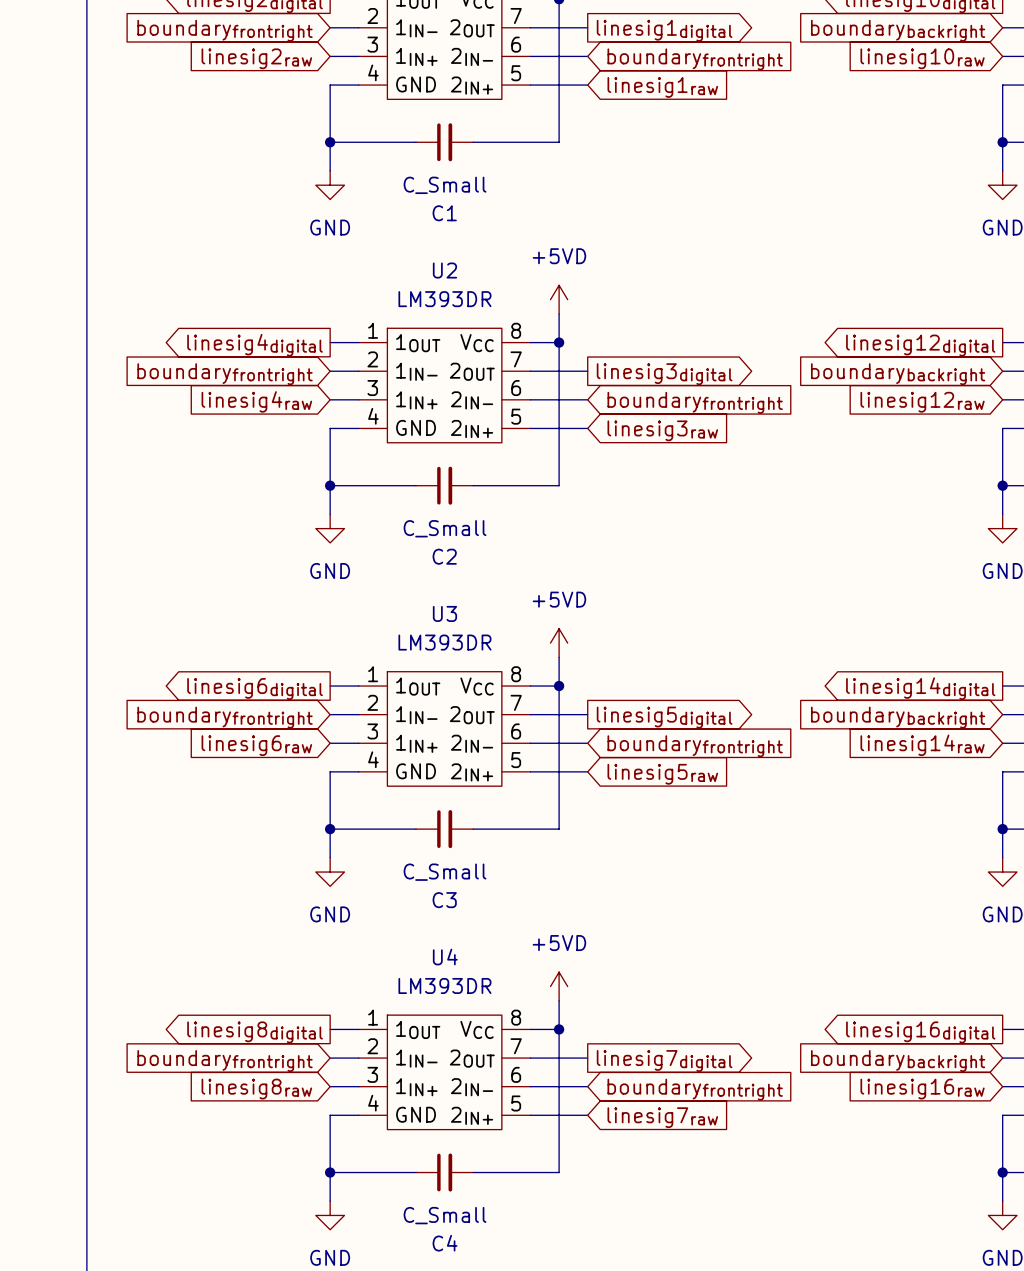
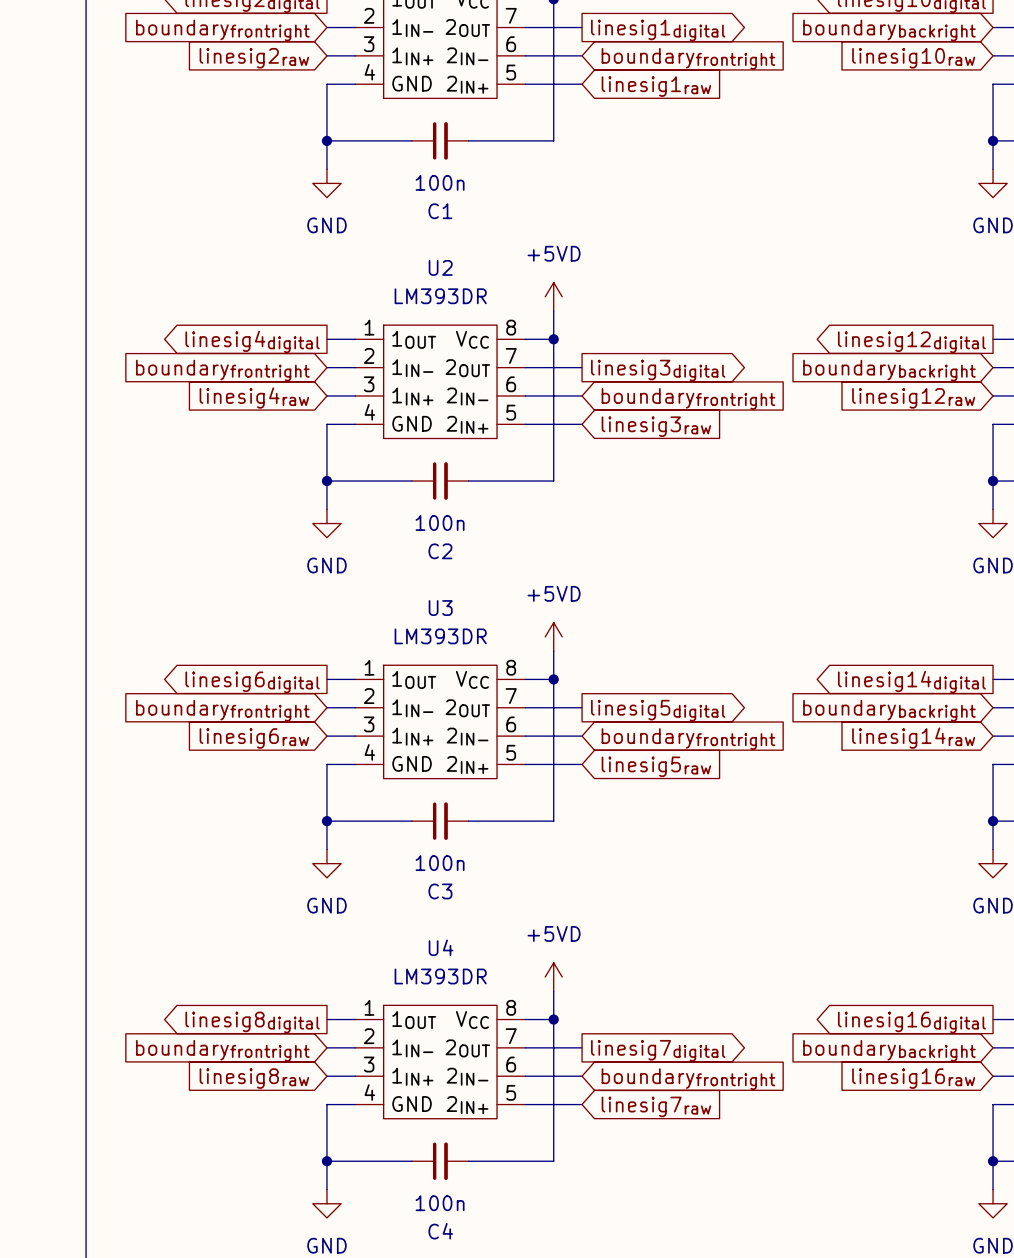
C1 value: C_Small (445, 185) -> 100n (440, 182)
C2 value: C_Small (445, 528) -> 100n (440, 523)
C3 value: C_Small (445, 872) -> 100n (440, 863)
C4 value: C_Small (445, 1215) -> 100n (440, 1203)

